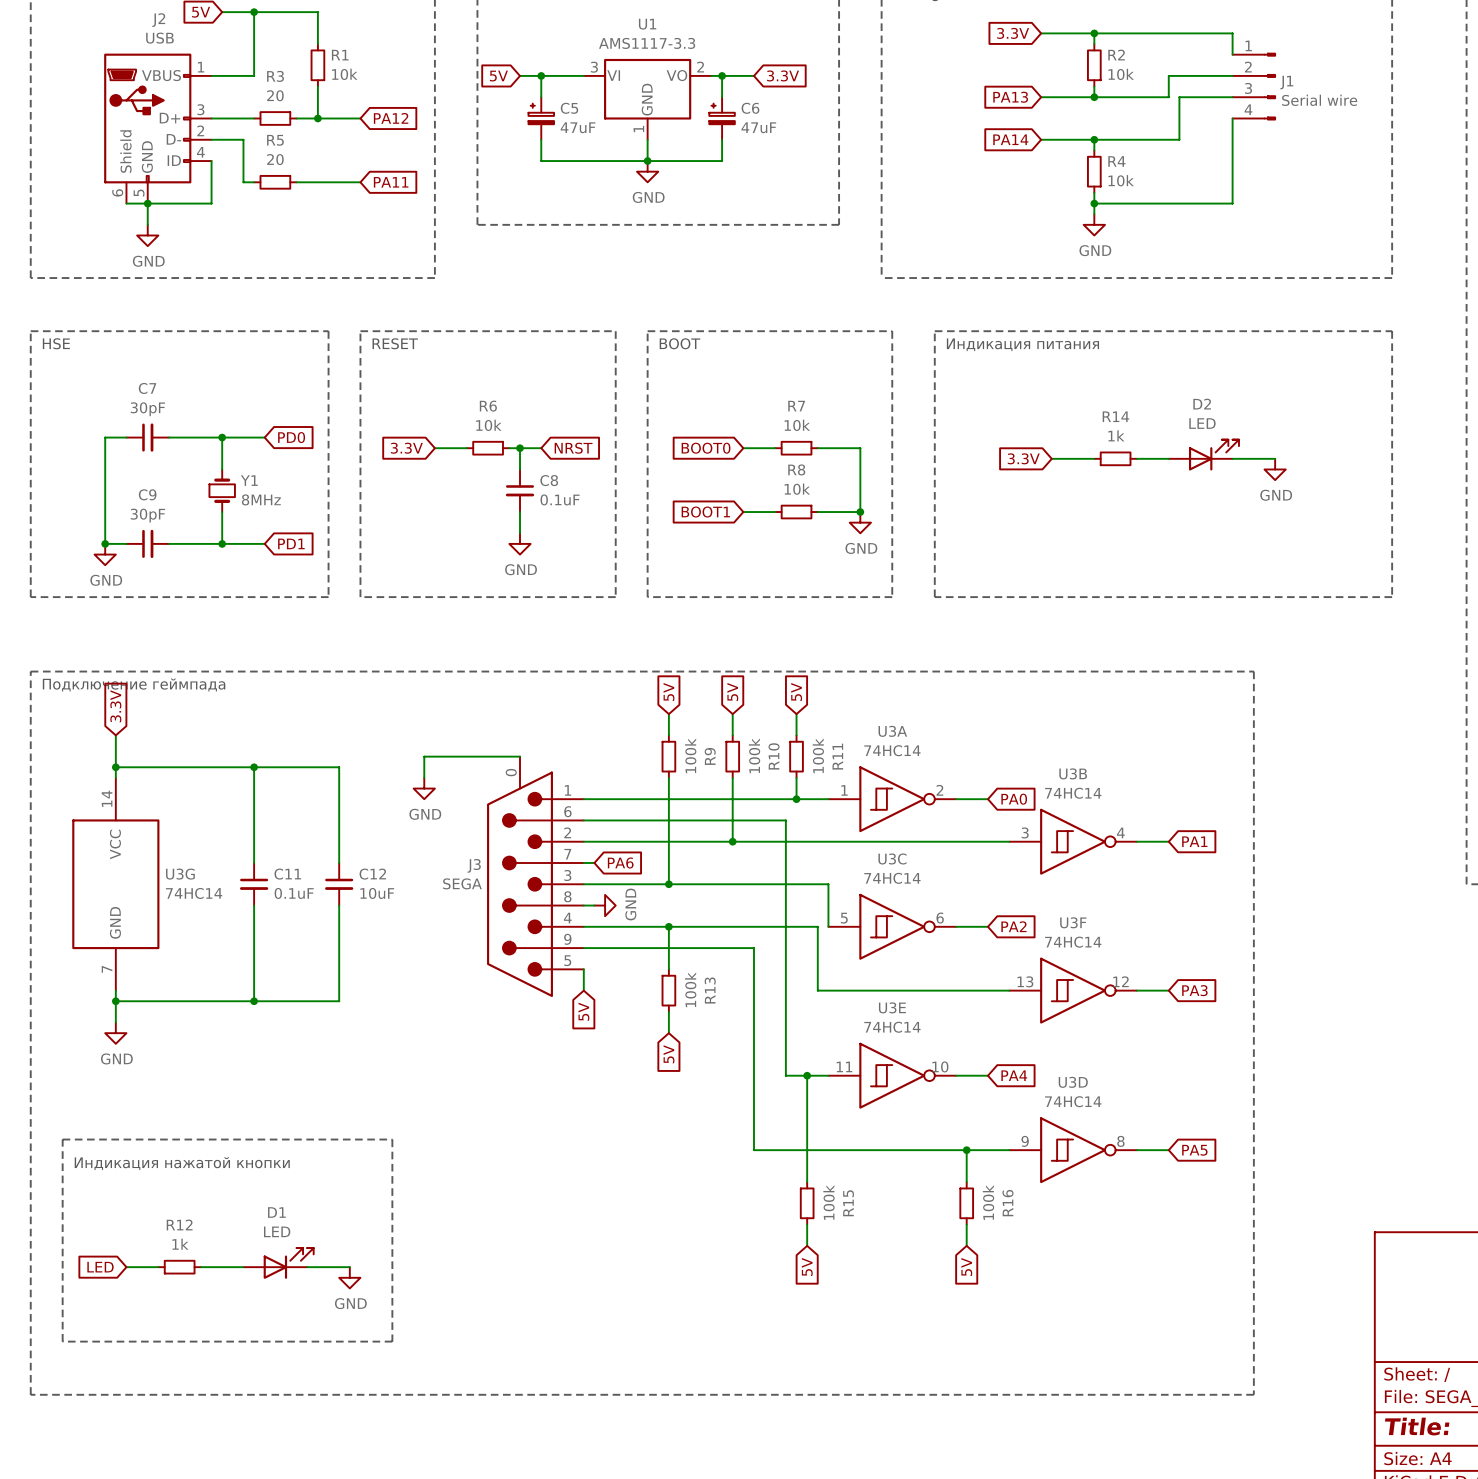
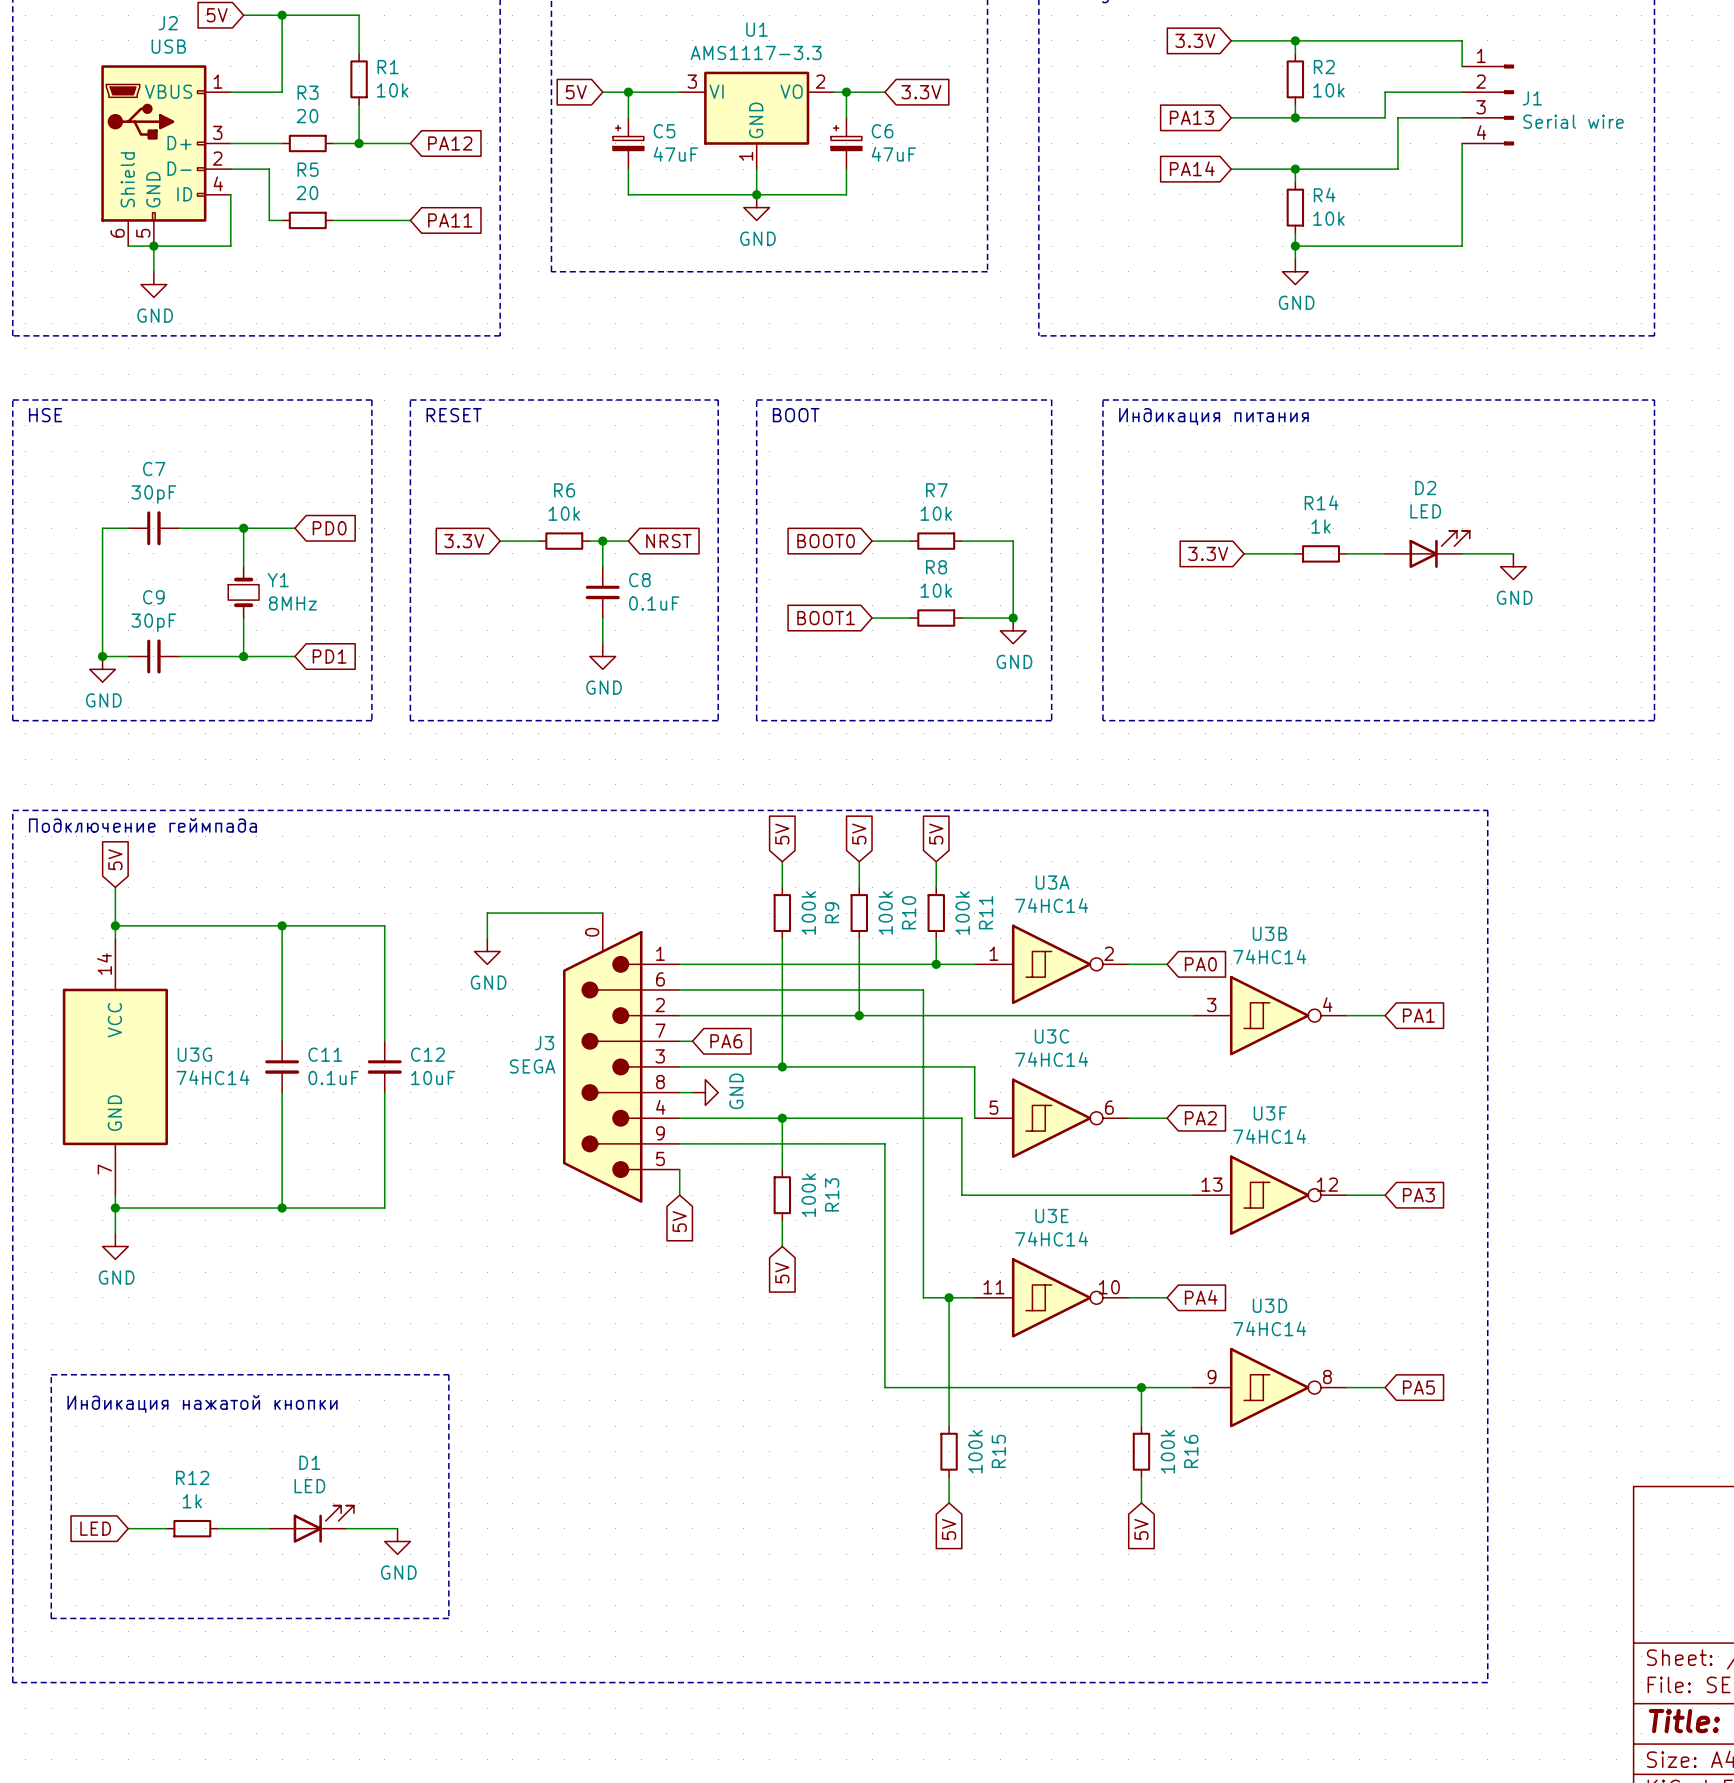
global label: 3.3V (115, 706) -> 5V (115, 859)

